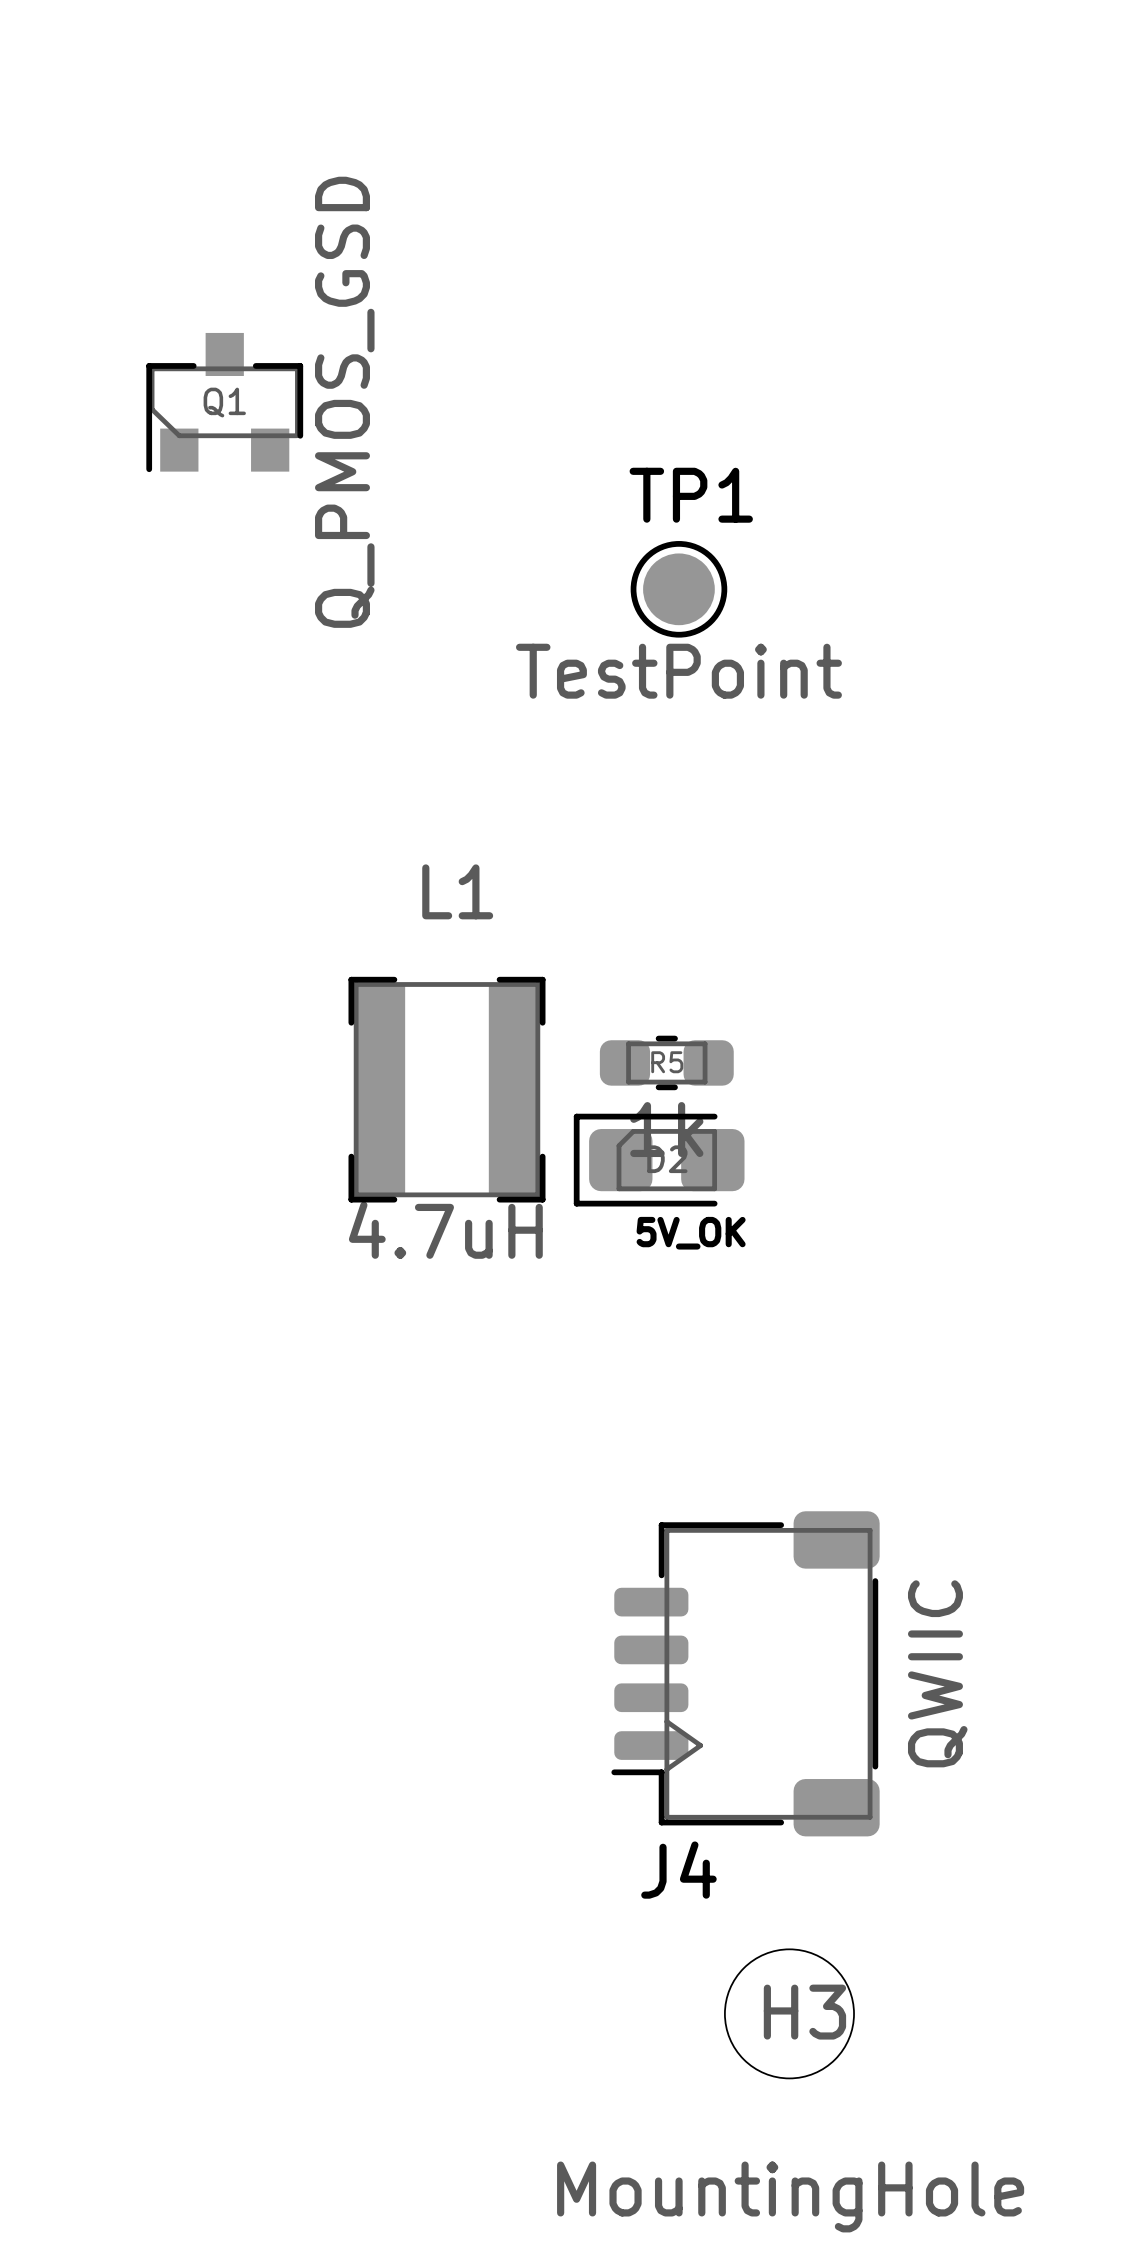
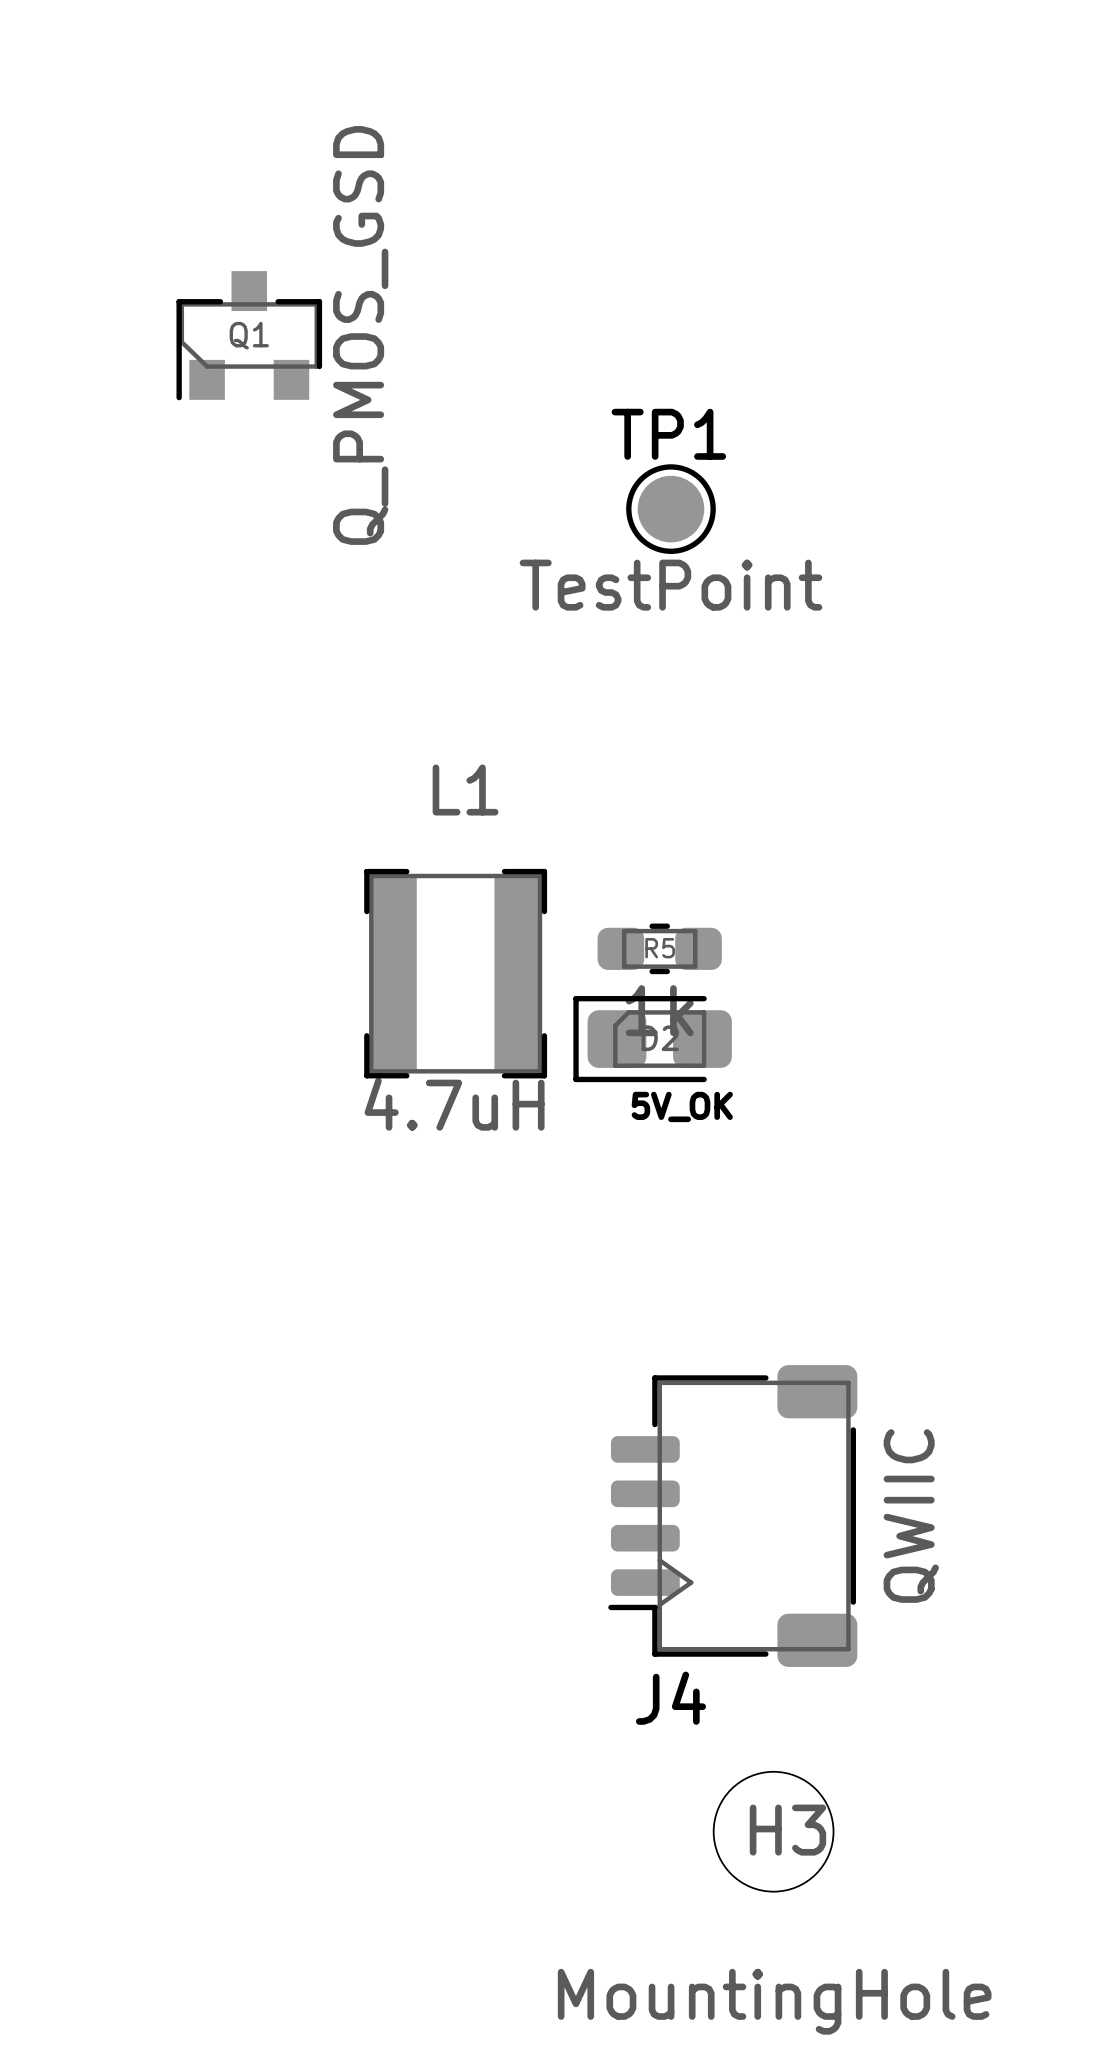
TP1 name position: TP1 (691, 495) -> TP1 (668, 434)

